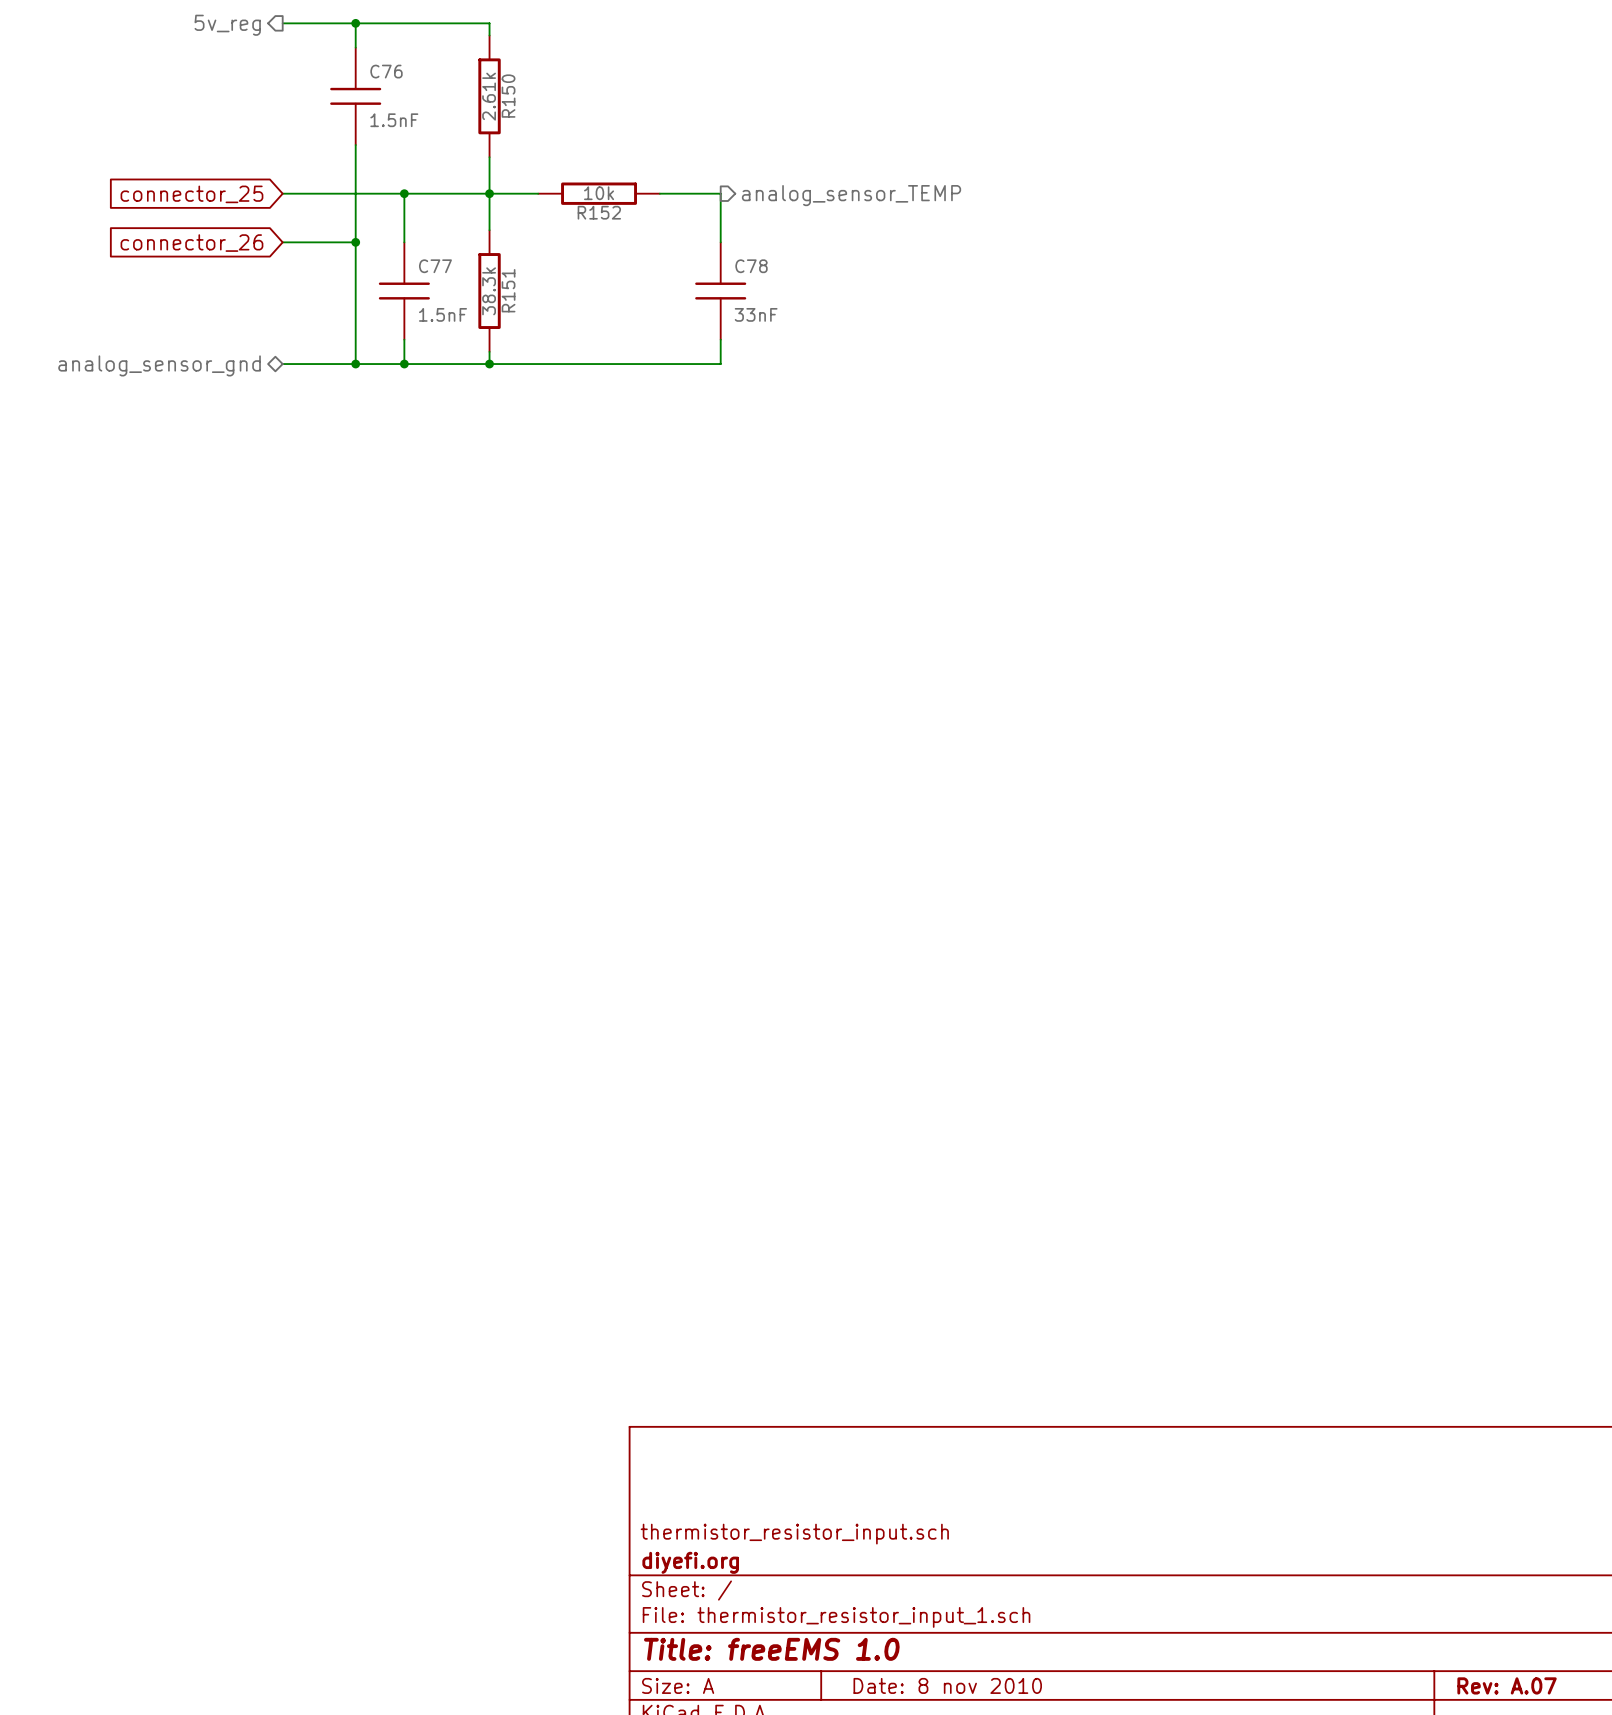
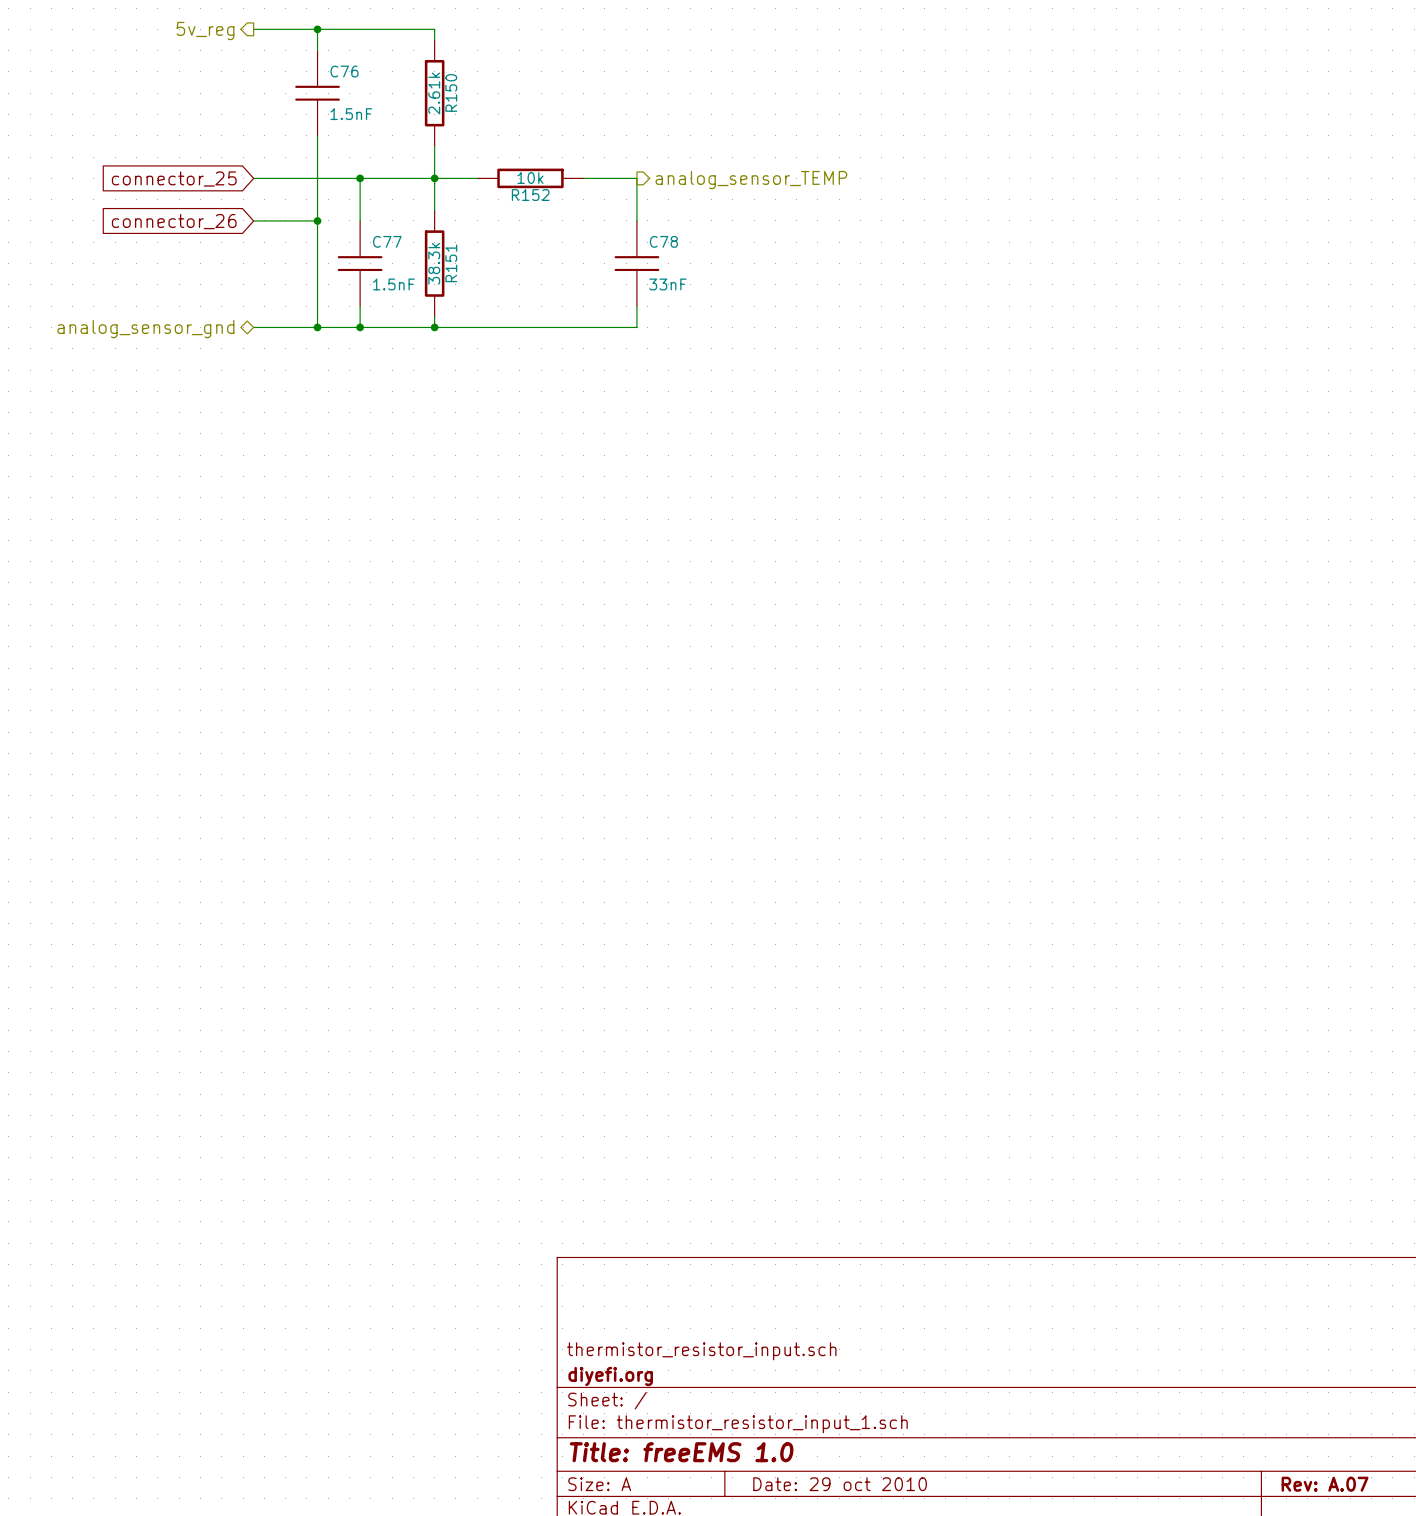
title block: Date: 8 nov 2010 (947, 1685) -> Date: 29 oct 2010 (840, 1484)

